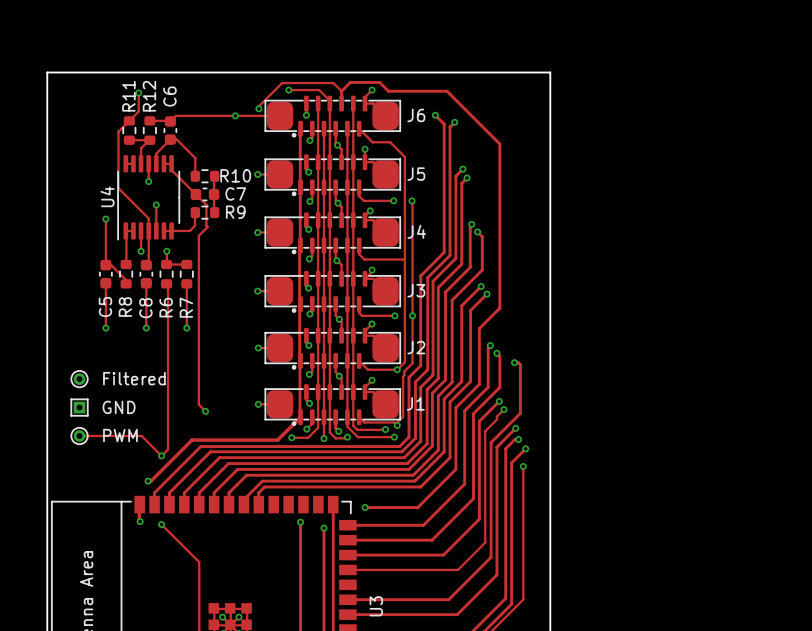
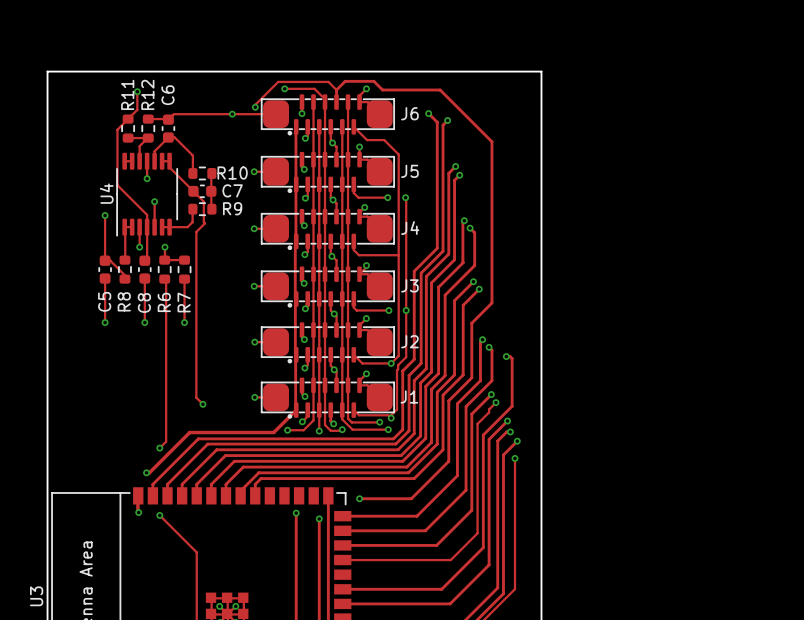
part: Filtered (79, 379) -> none
part: GND (79, 407) -> none
track: (79, 435) (141, 435) (161, 455) -> none
part: PWM (79, 435) -> none
U3 name position: U3 (376, 606) -> U3 (36, 596)

